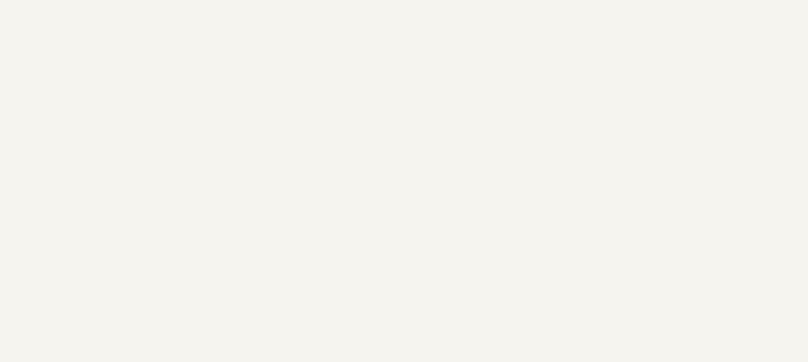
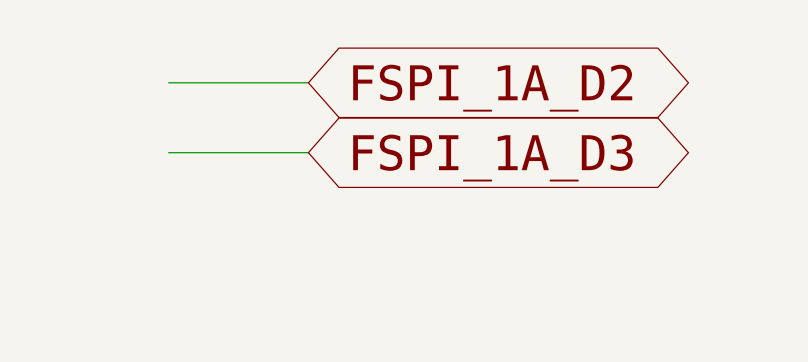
wire: none -> (168, 82) (308, 82)
global label: none -> FSPI_1A_D2 (492, 88)
wire: none -> (168, 152) (308, 152)
global label: none -> FSPI_1A_D3 (492, 158)

